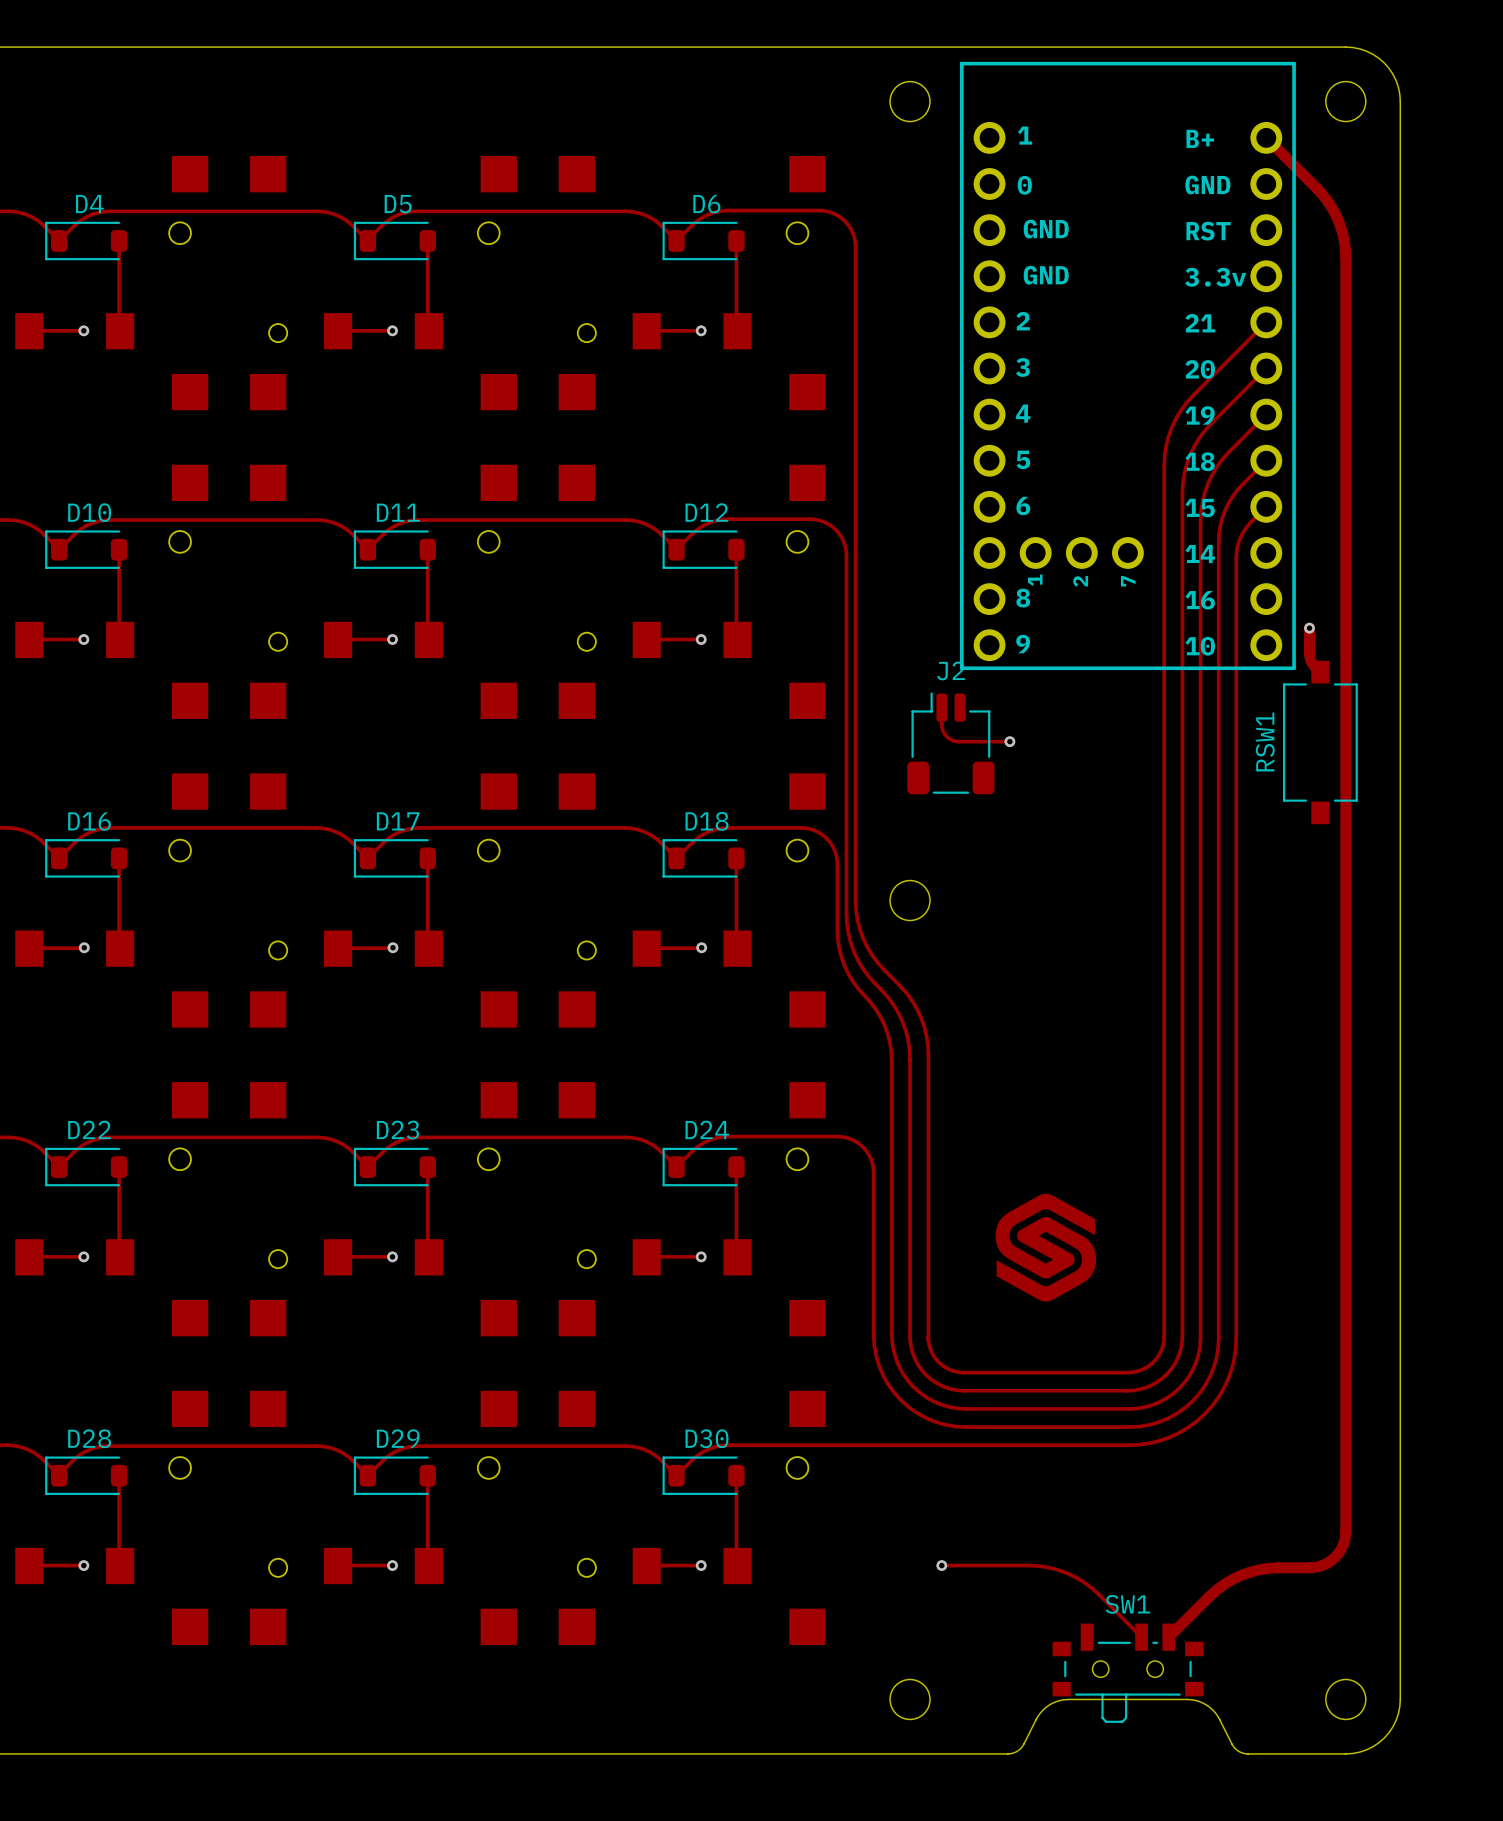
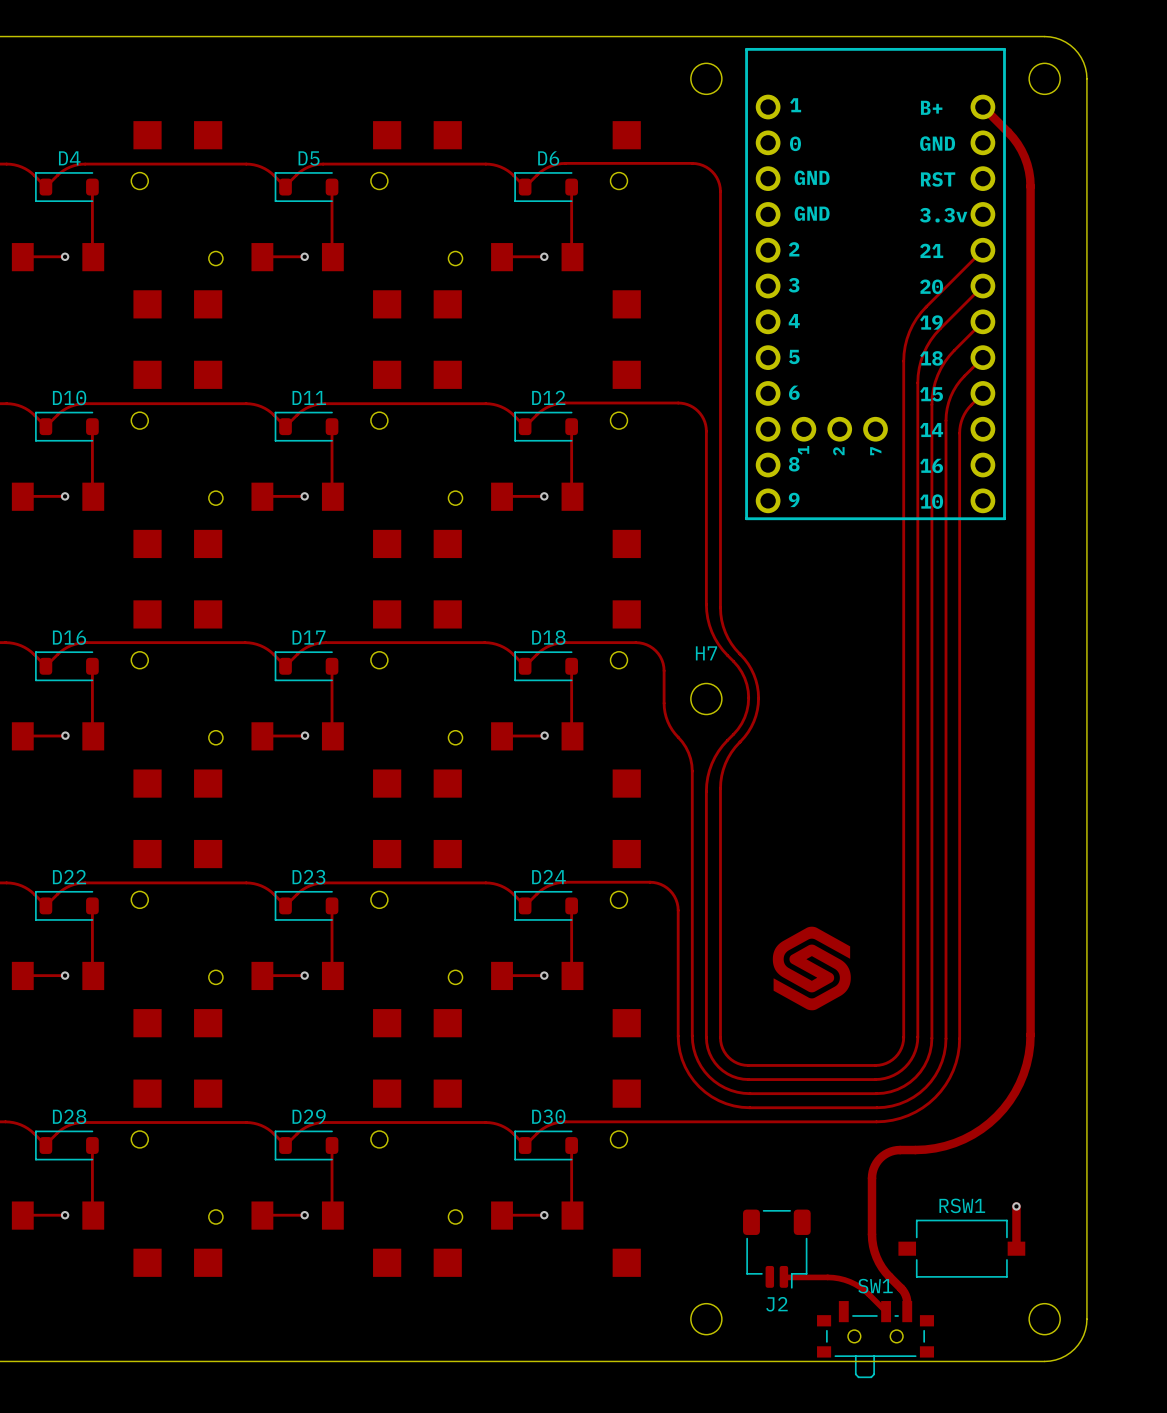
track: (1298, 170) (1323, 195) (1334, 211) (1341, 229) (1345, 258) (1345, 1536) (1338, 1553) (1323, 1565) (1314, 1567) (1259, 1569) (1232, 1579) (1216, 1590) (1168, 1637) -> (1008, 132) (1024, 157) (1030, 186) (1030, 1044) (1023, 1074) (1015, 1092) (1003, 1108) (989, 1123) (964, 1139) (945, 1146) (890, 1151) (882, 1156) (874, 1165) (871, 1178) (873, 1246) (882, 1267) (904, 1292) (907, 1311)
track: (819, 210) (833, 213) (844, 221) (852, 232) (855, 246) (855, 864) -> (635, 163) (699, 164) (714, 174) (720, 187) (720, 614) (728, 638) (748, 664) (753, 674) (758, 698) (753, 721) (748, 732) (728, 757) (720, 782) (720, 1037)
track: (810, 519) (824, 521) (832, 526) (841, 537) (846, 550) (846, 914) (848, 933) (853, 951) (863, 968) (887, 996) (898, 1012) (905, 1030) (910, 1059) -> (628, 403) (684, 403) (698, 411) (705, 424) (707, 618) (718, 644) (741, 672) (746, 684) (748, 697) (746, 711) (741, 723) (718, 751) (709, 770) (706, 784) (706, 822)
track: (1309, 628) (1309, 657) (1312, 663) (1320, 672) -> none
via: (1309, 628) -> none
track: (941, 707) (942, 729) (950, 739) (958, 741) (1009, 741) -> none
via: (1009, 741) -> none
RSW1 rotation: 0° (1320, 742) -> 90° clockwise (961, 1248)
RSW1 position: (1320, 742) -> (961, 1248)
J2 rotation: 0° (950, 743) -> 180° (776, 1249)
J2 position: (950, 743) -> (776, 1249)
track: (801, 827) (819, 832) (826, 838) (834, 850) (837, 864) (837, 939) (841, 957) (853, 981) (880, 1017) (887, 1034) (891, 1061) -> (664, 698) (667, 721) (685, 747) (690, 758) (692, 824)
track: none -> (621, 642) (639, 642) (650, 646) (660, 656) (664, 670)
H7 name: none -> H7 (706, 653)
track: (855, 900) (859, 929) (867, 947) (877, 963) (911, 1000) (920, 1017) (926, 1035) (928, 1055) (928, 1340) -> none
track: none -> (1016, 1206) (1016, 1248)
via: none -> (1016, 1206)
track: (941, 1565) (1038, 1566) (1066, 1573) (1091, 1587) (1141, 1637) -> none
via: (941, 1565) -> none
track: none -> (783, 1276) (833, 1277) (844, 1279) (864, 1290) (886, 1311)
SW1 position: (1127, 1673) -> (875, 1339)
board edge: (1007, 1753) (1015, 1752) (1021, 1747) (1043, 1709) (1053, 1702) (1068, 1699) (1187, 1699) (1199, 1701) (1215, 1712) (1235, 1748) (1248, 1753) -> (782, 1361) (968, 1361)

